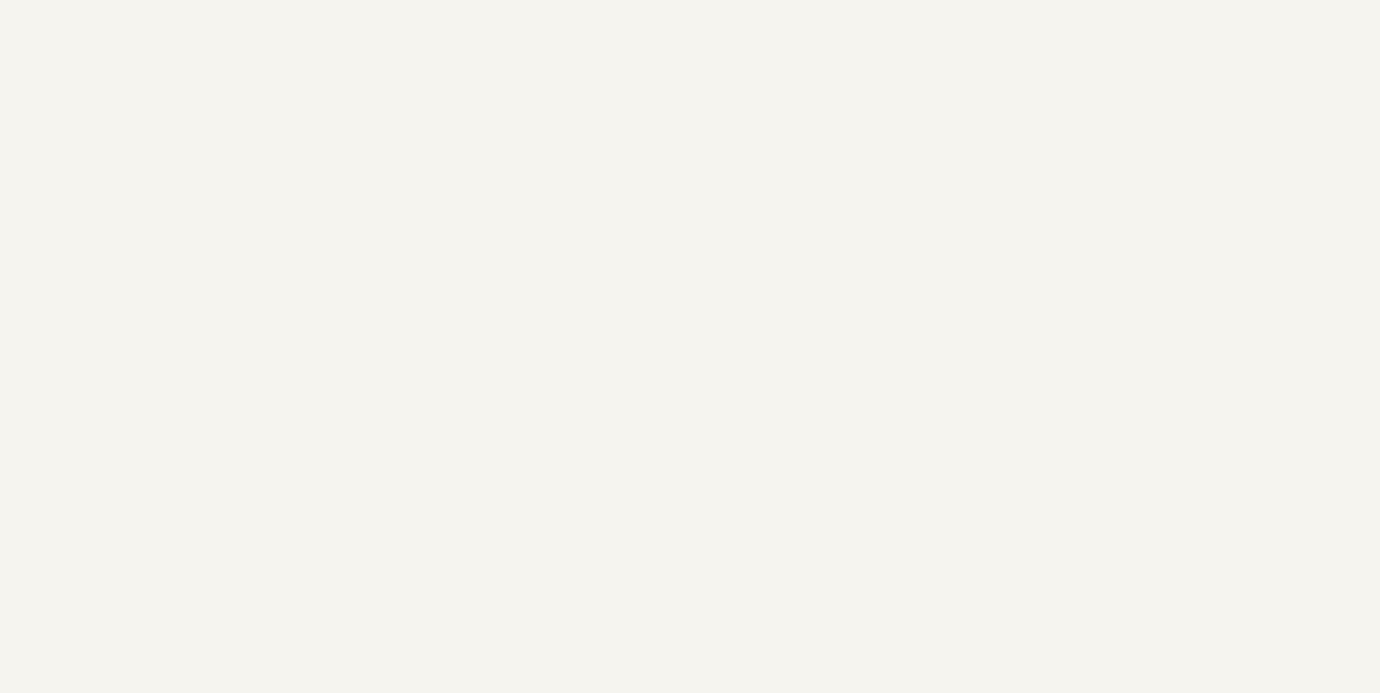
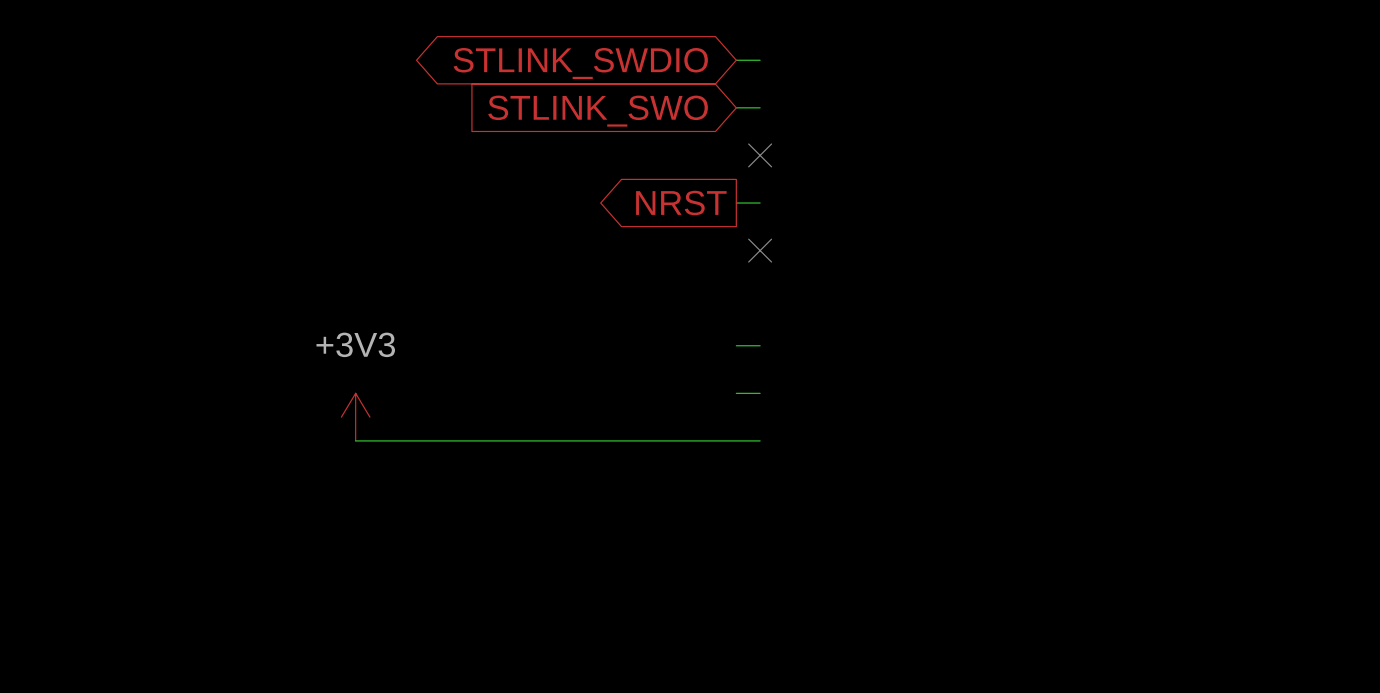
wire: none -> (736, 60) (760, 60)
global label: none -> STLINK_SWDIO (580, 63)
wire: none -> (736, 107) (760, 107)
global label: none -> STLINK_SWO (598, 111)
no-connect mark: none -> (760, 155)
global label: none -> NRST (681, 203)
wire: none -> (736, 203) (760, 203)
no-connect mark: none -> (760, 250)
wire: none -> (736, 345) (760, 345)
wire: none -> (736, 393) (760, 393)
power symbol: none -> +3V3 (355, 417)
wire: none -> (355, 440) (760, 440)

